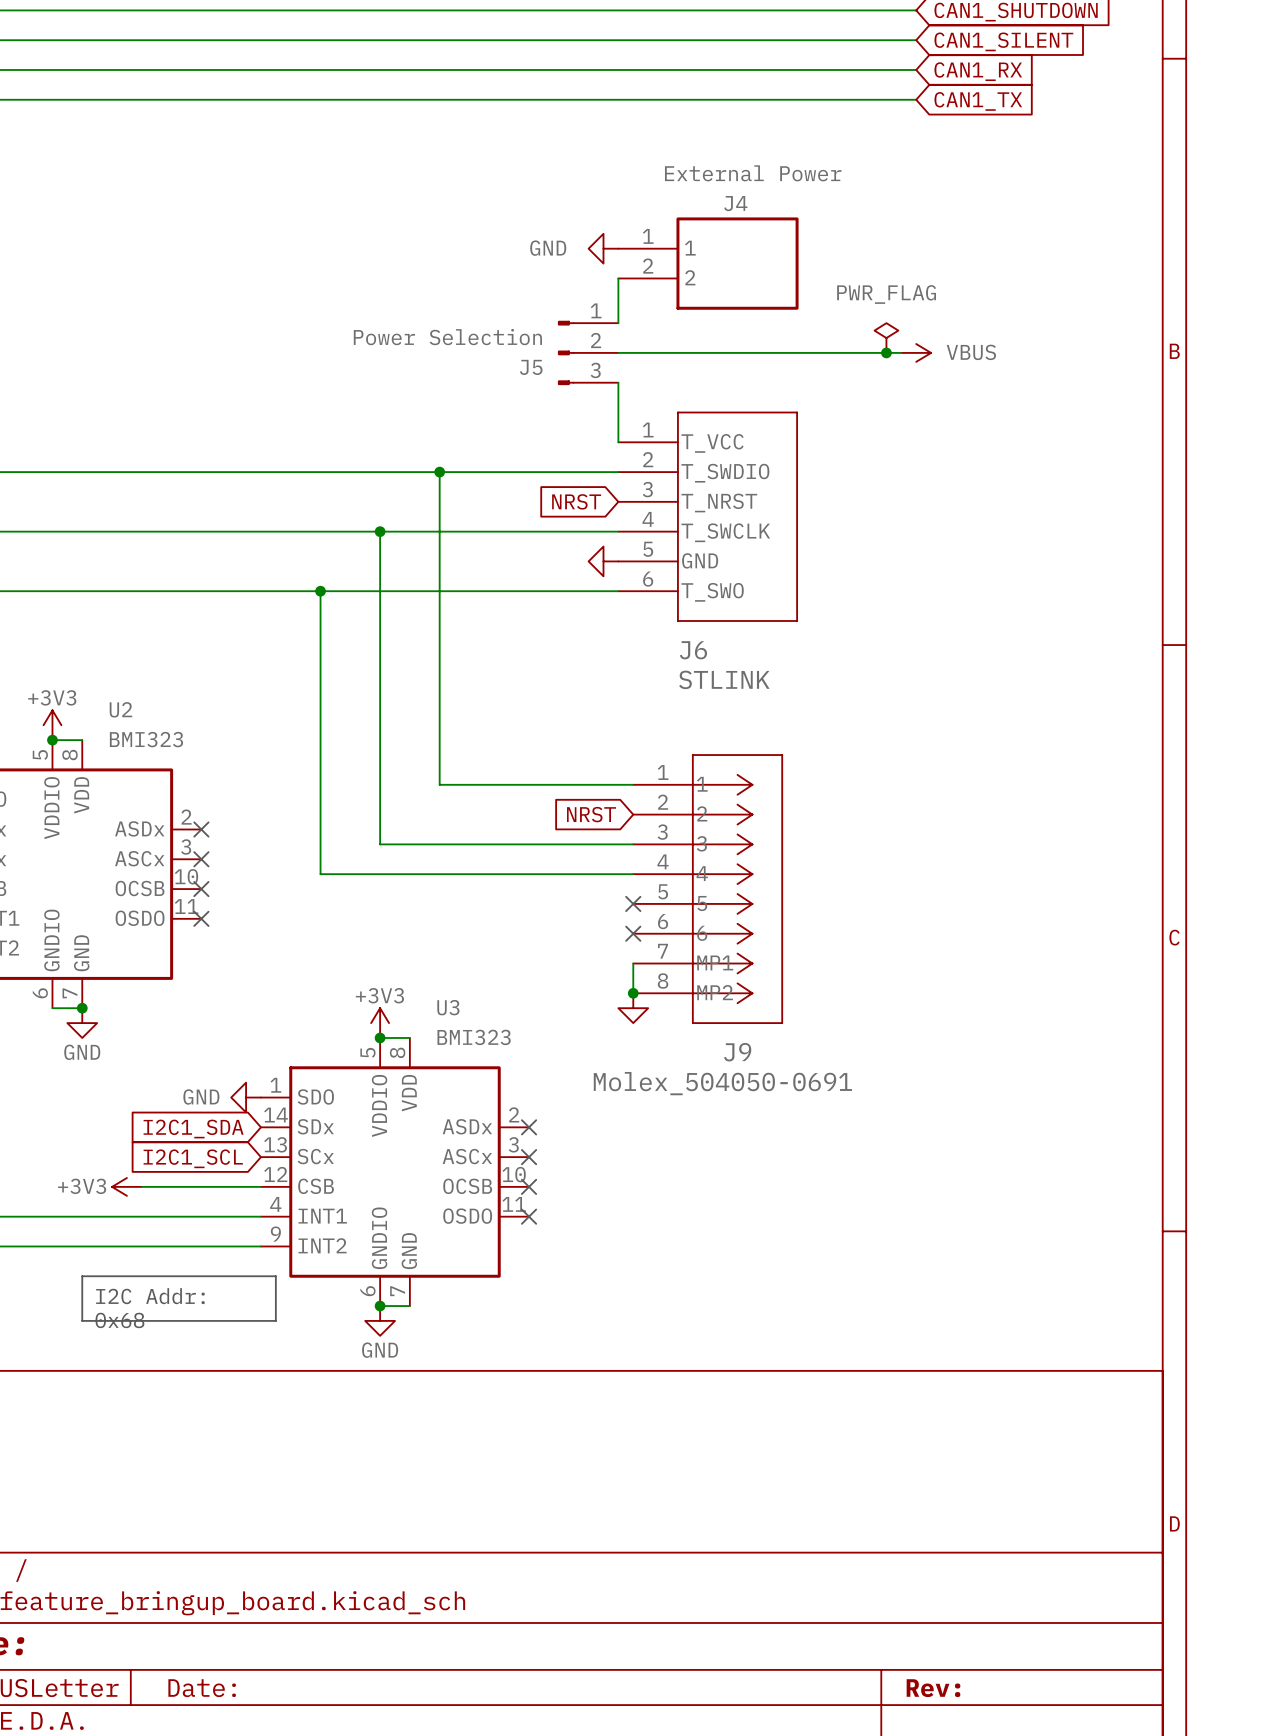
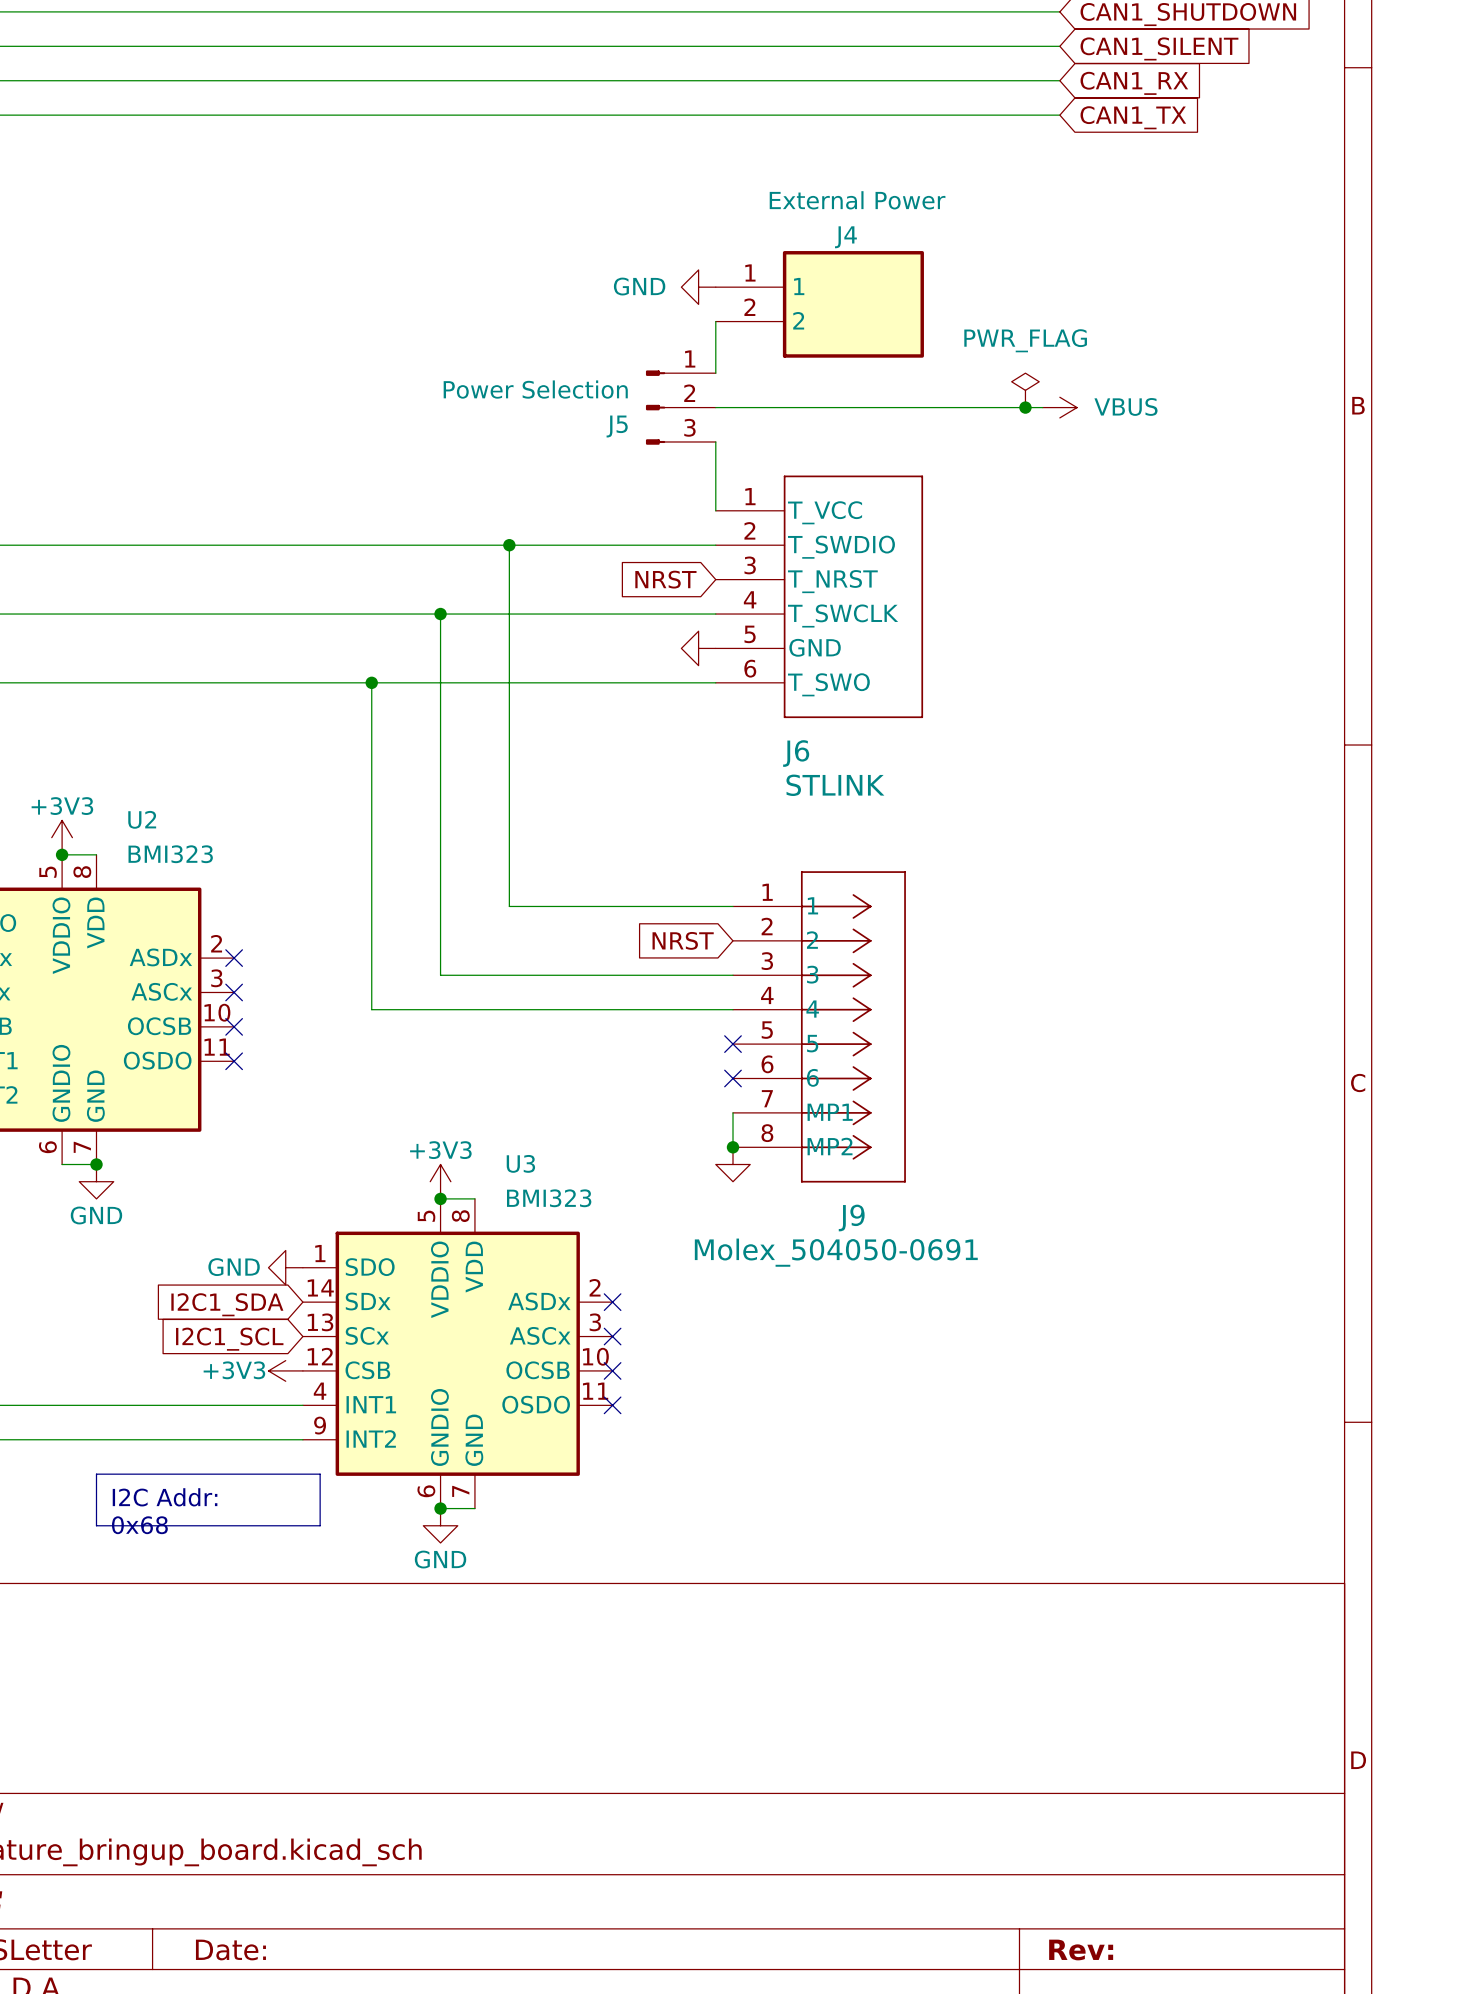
power symbol position: +3V3 (126, 1186) -> +3V3 (285, 1370)
wire: (141, 1186) (260, 1186) -> none

